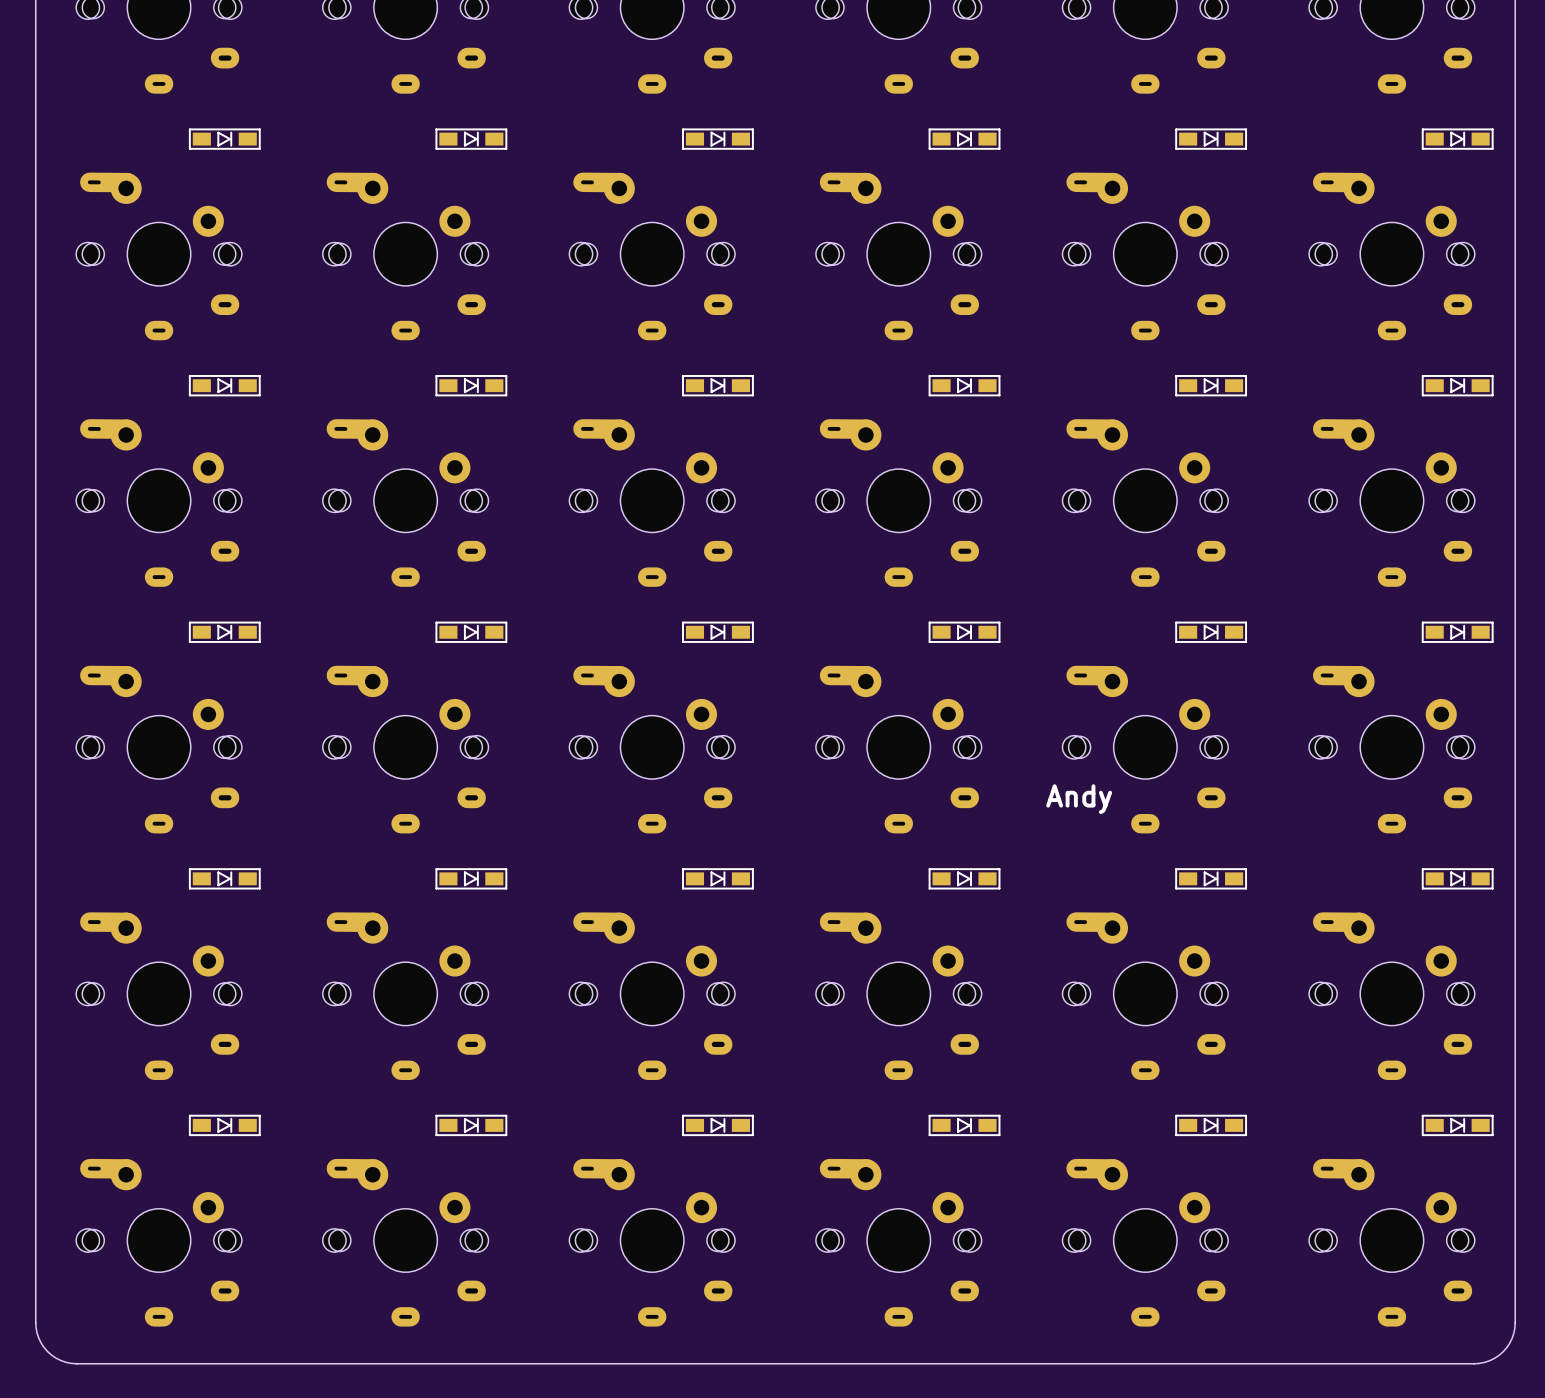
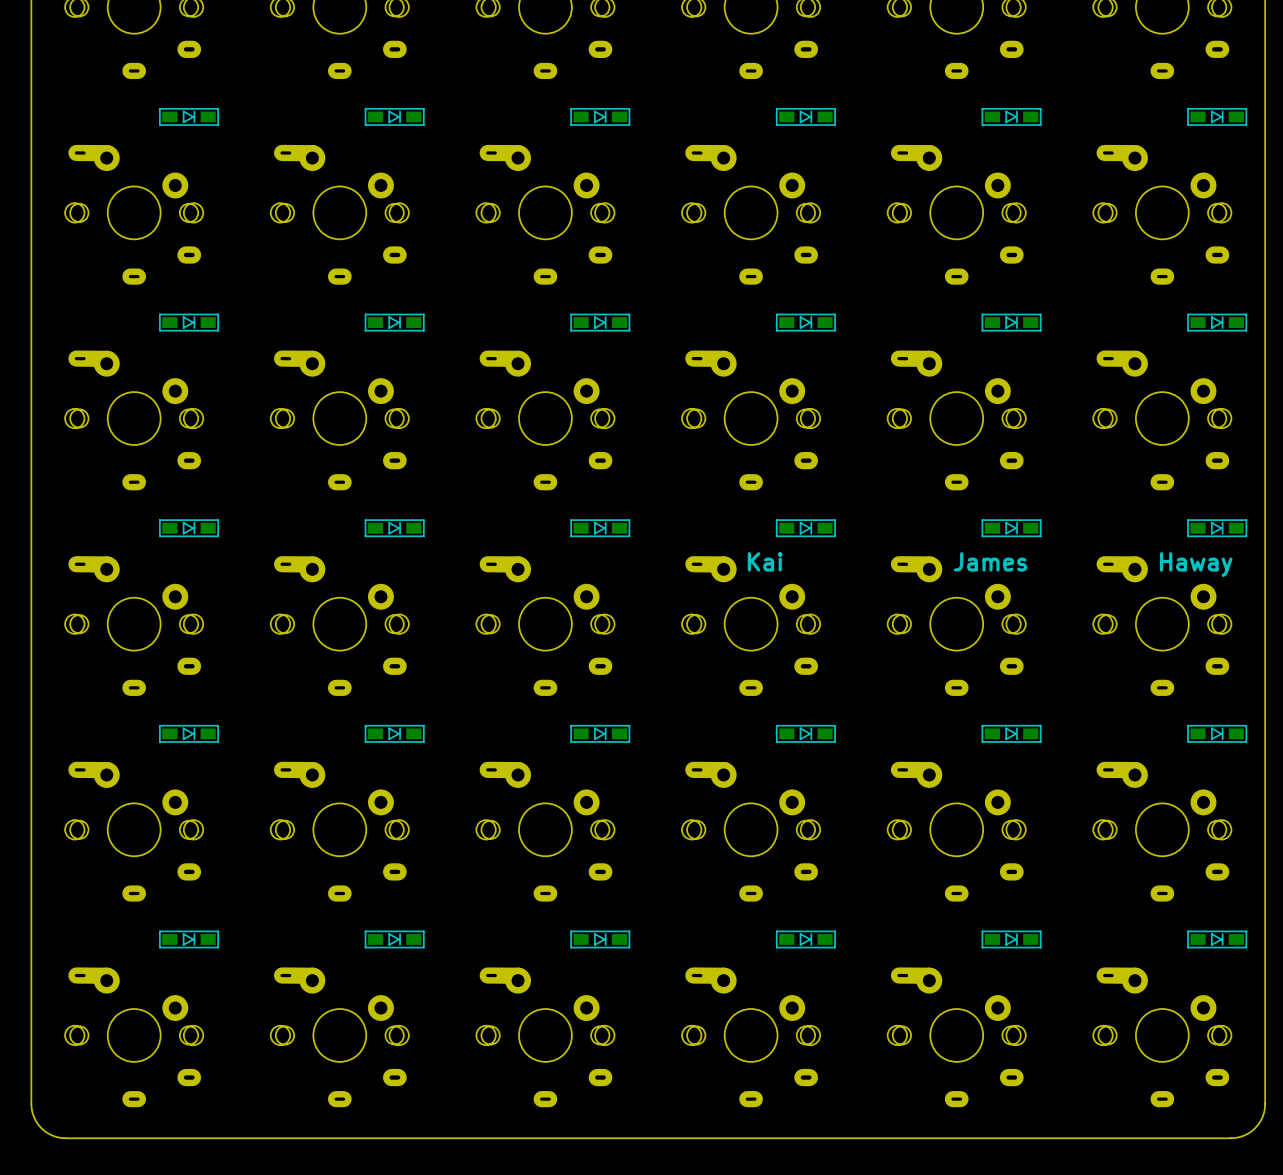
text: none -> Kai (765, 561)
text: none -> James (990, 561)
text: none -> Haway (1196, 564)
text: Andy (1079, 799) -> none

